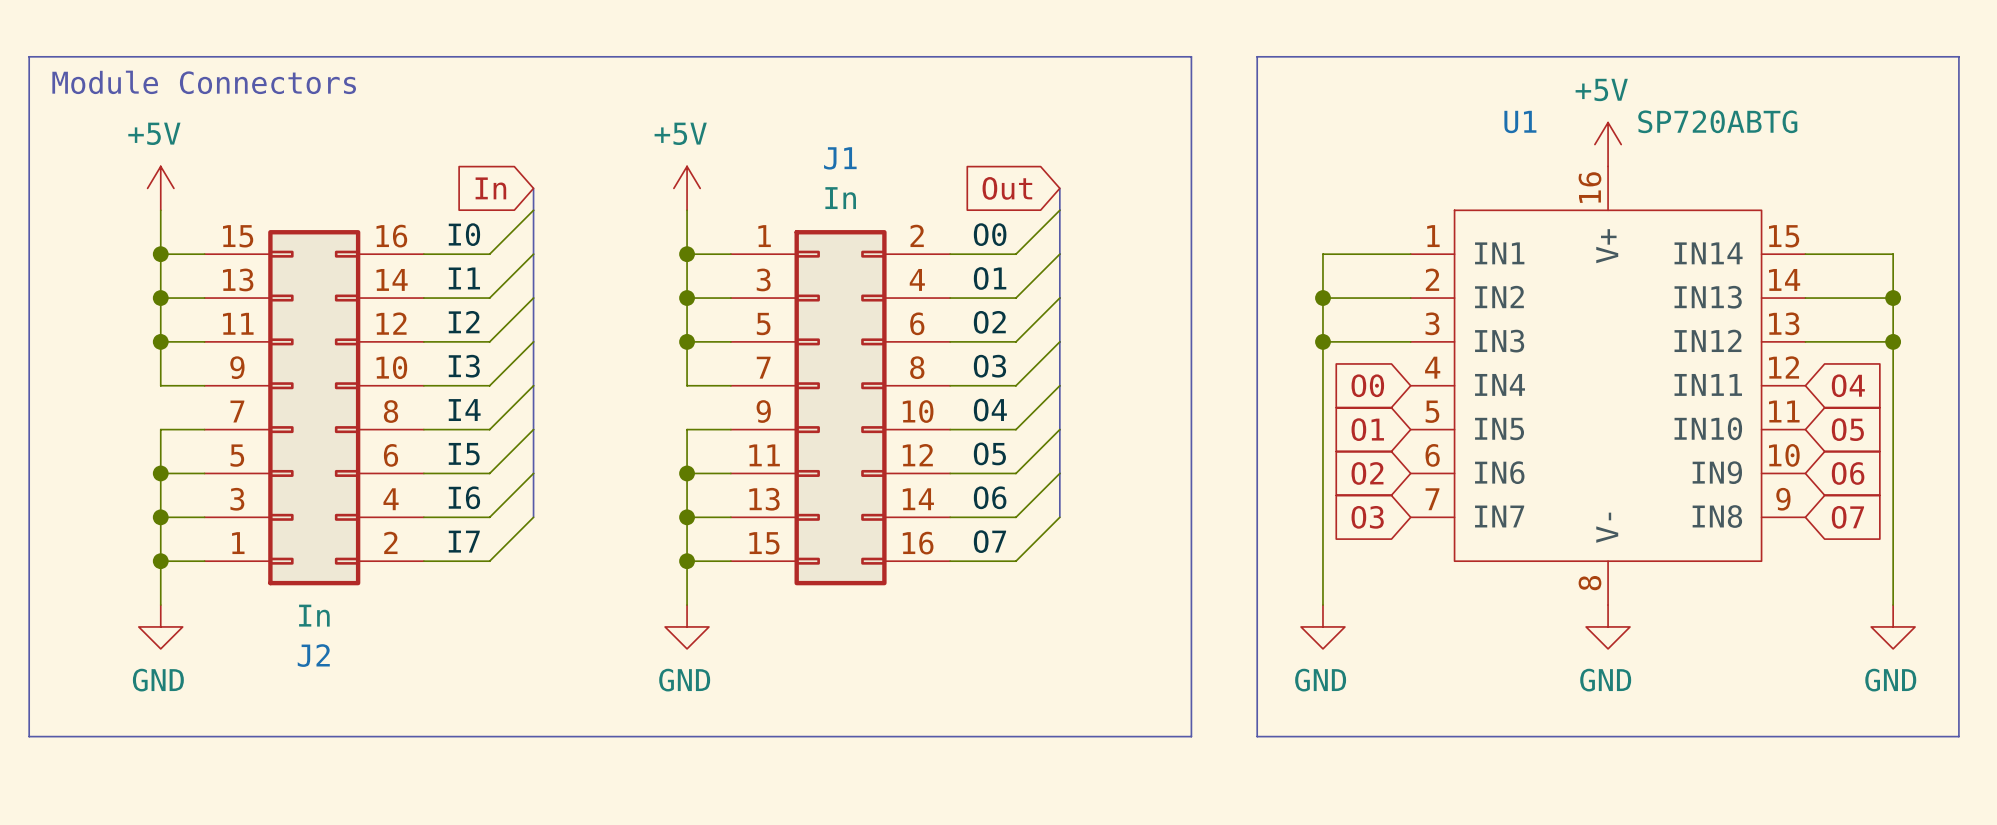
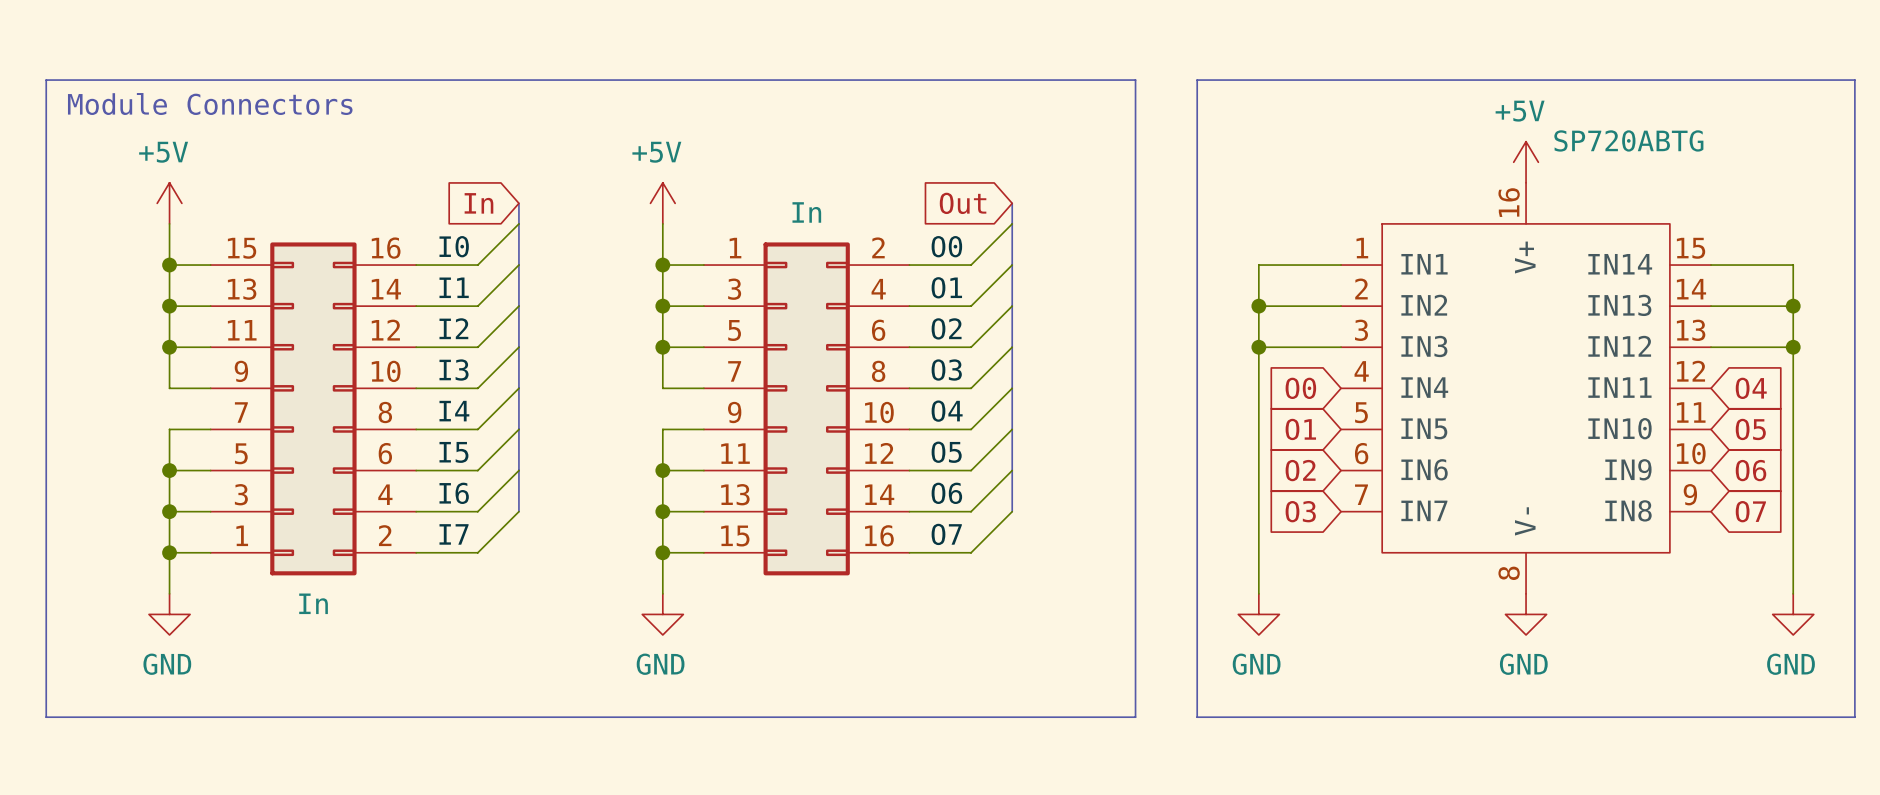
U1 name: U1 (1520, 121) -> none
J1 name: J1 (840, 158) -> none
J2 name: J2 (313, 655) -> none

